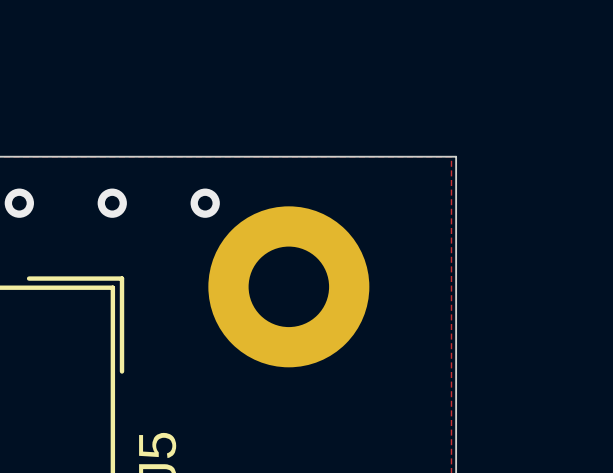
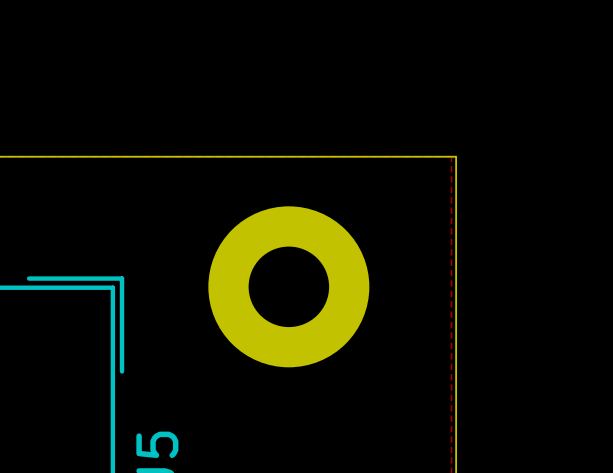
via: (19, 203) -> none
via: (112, 203) -> none
via: (205, 203) -> none

